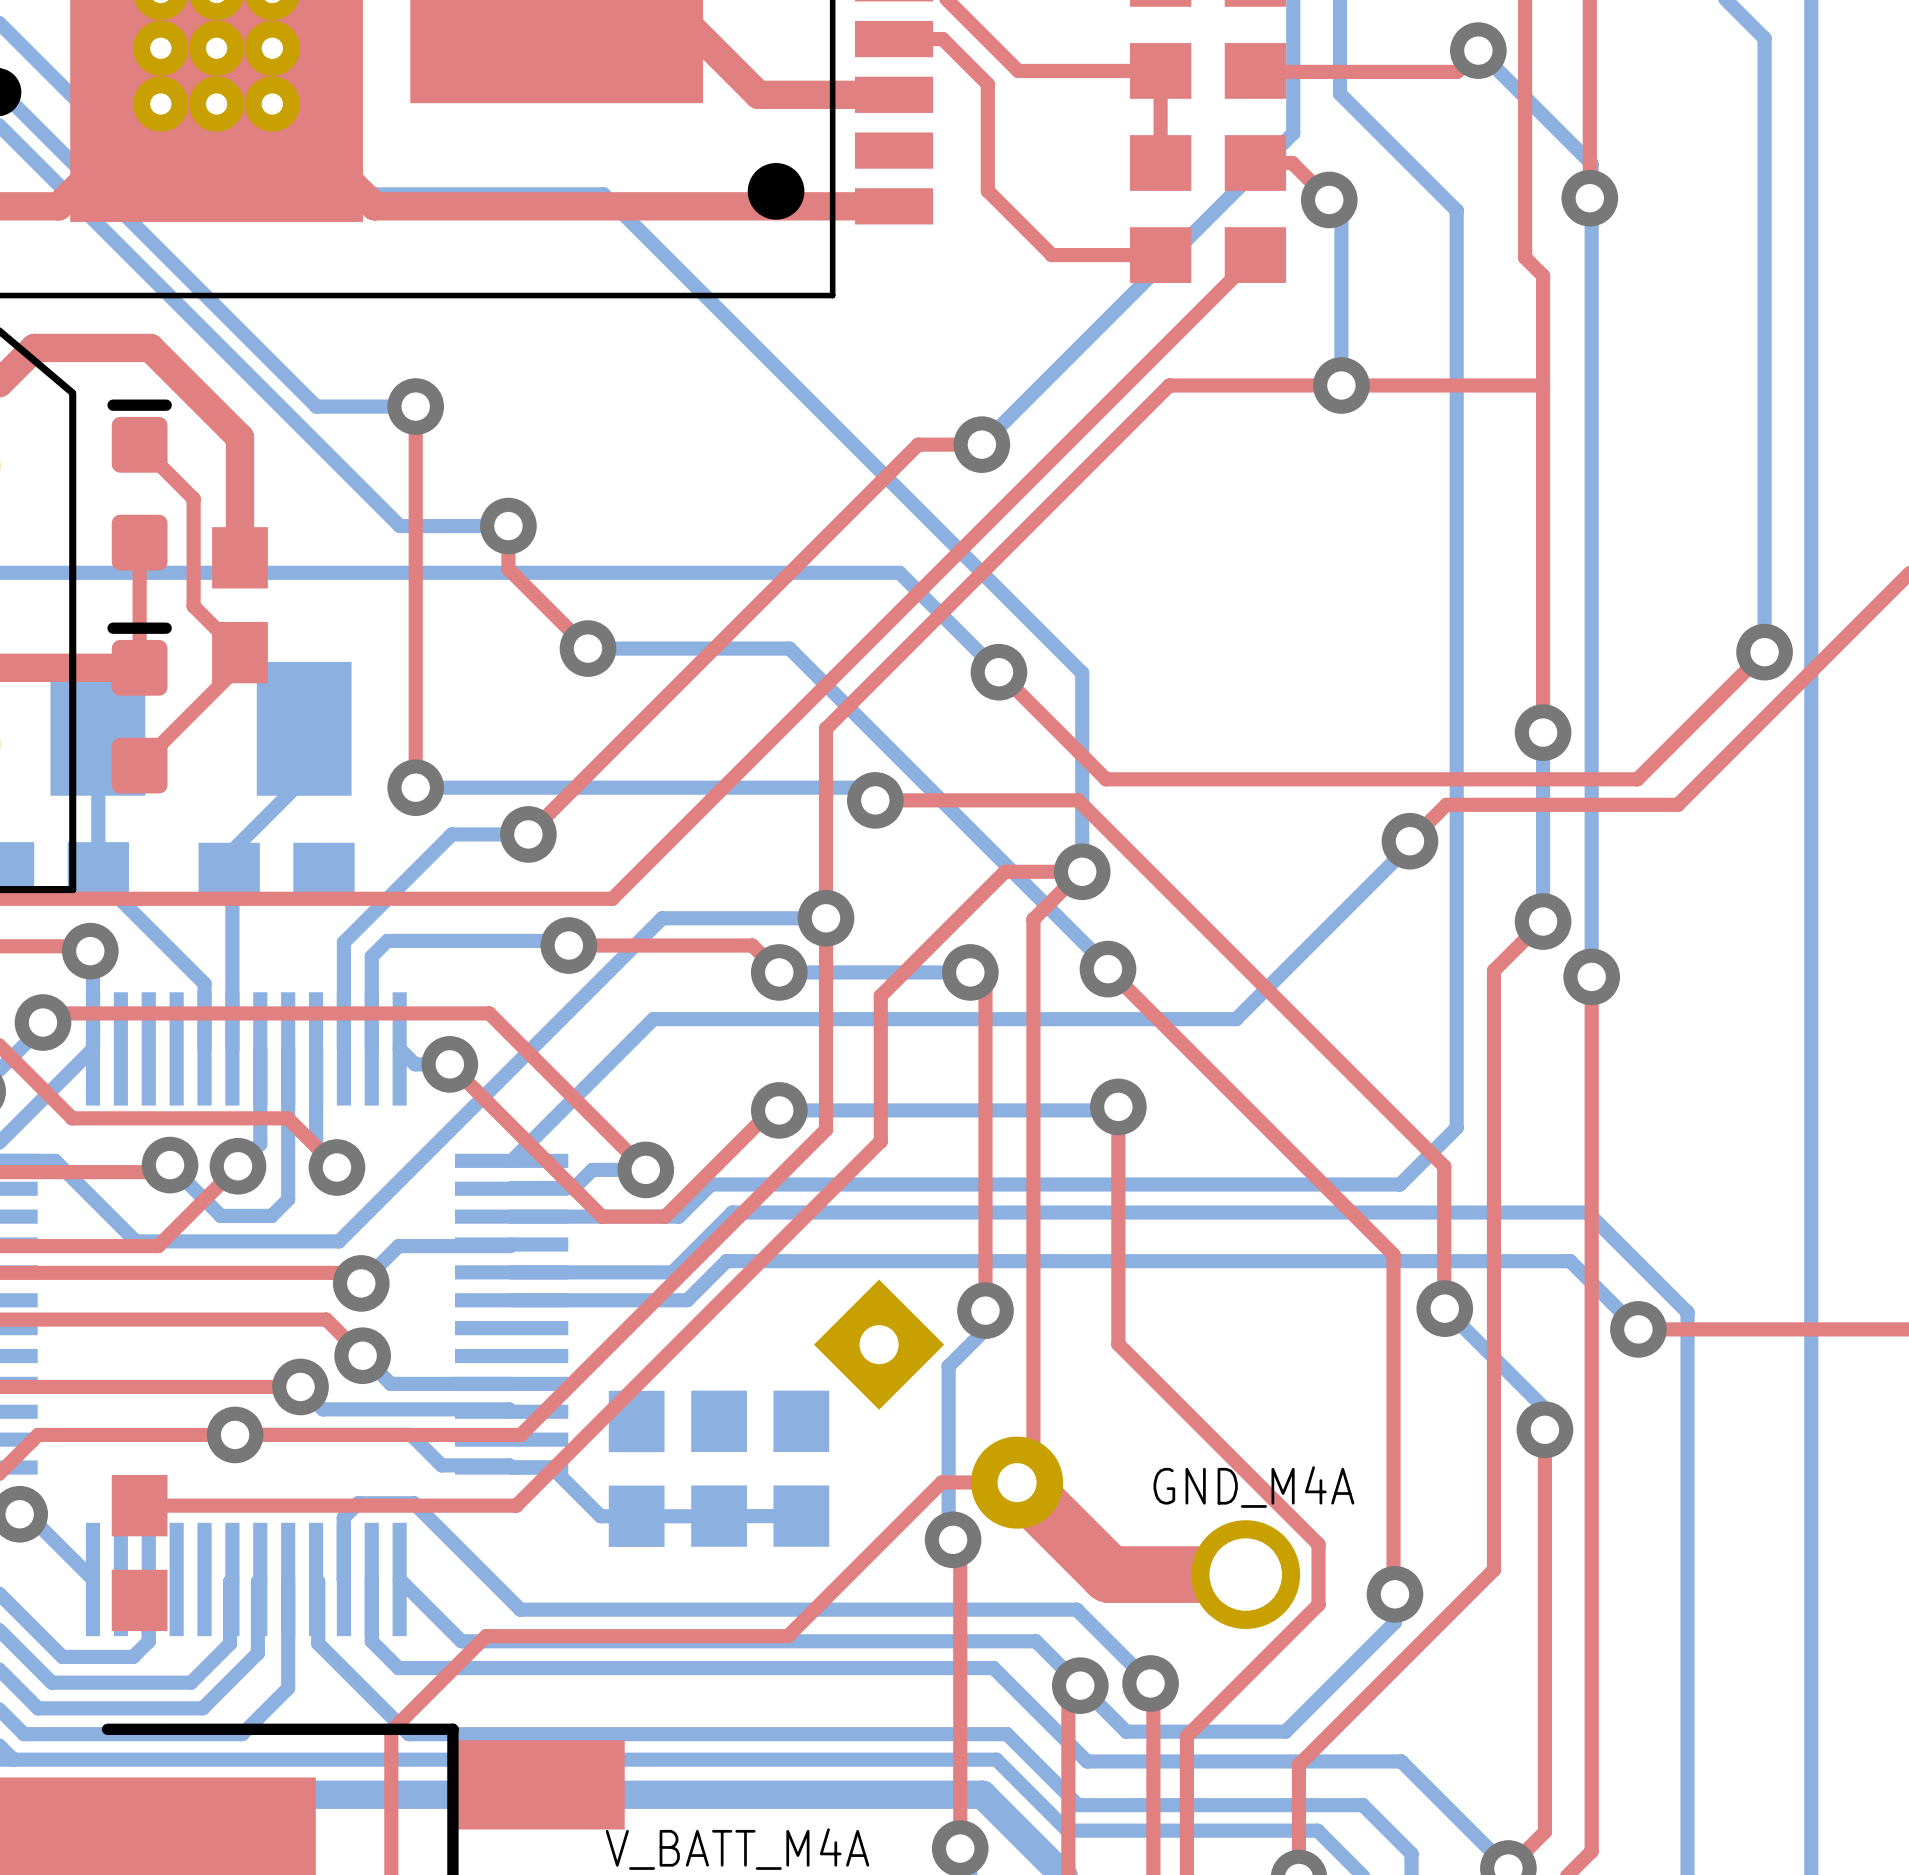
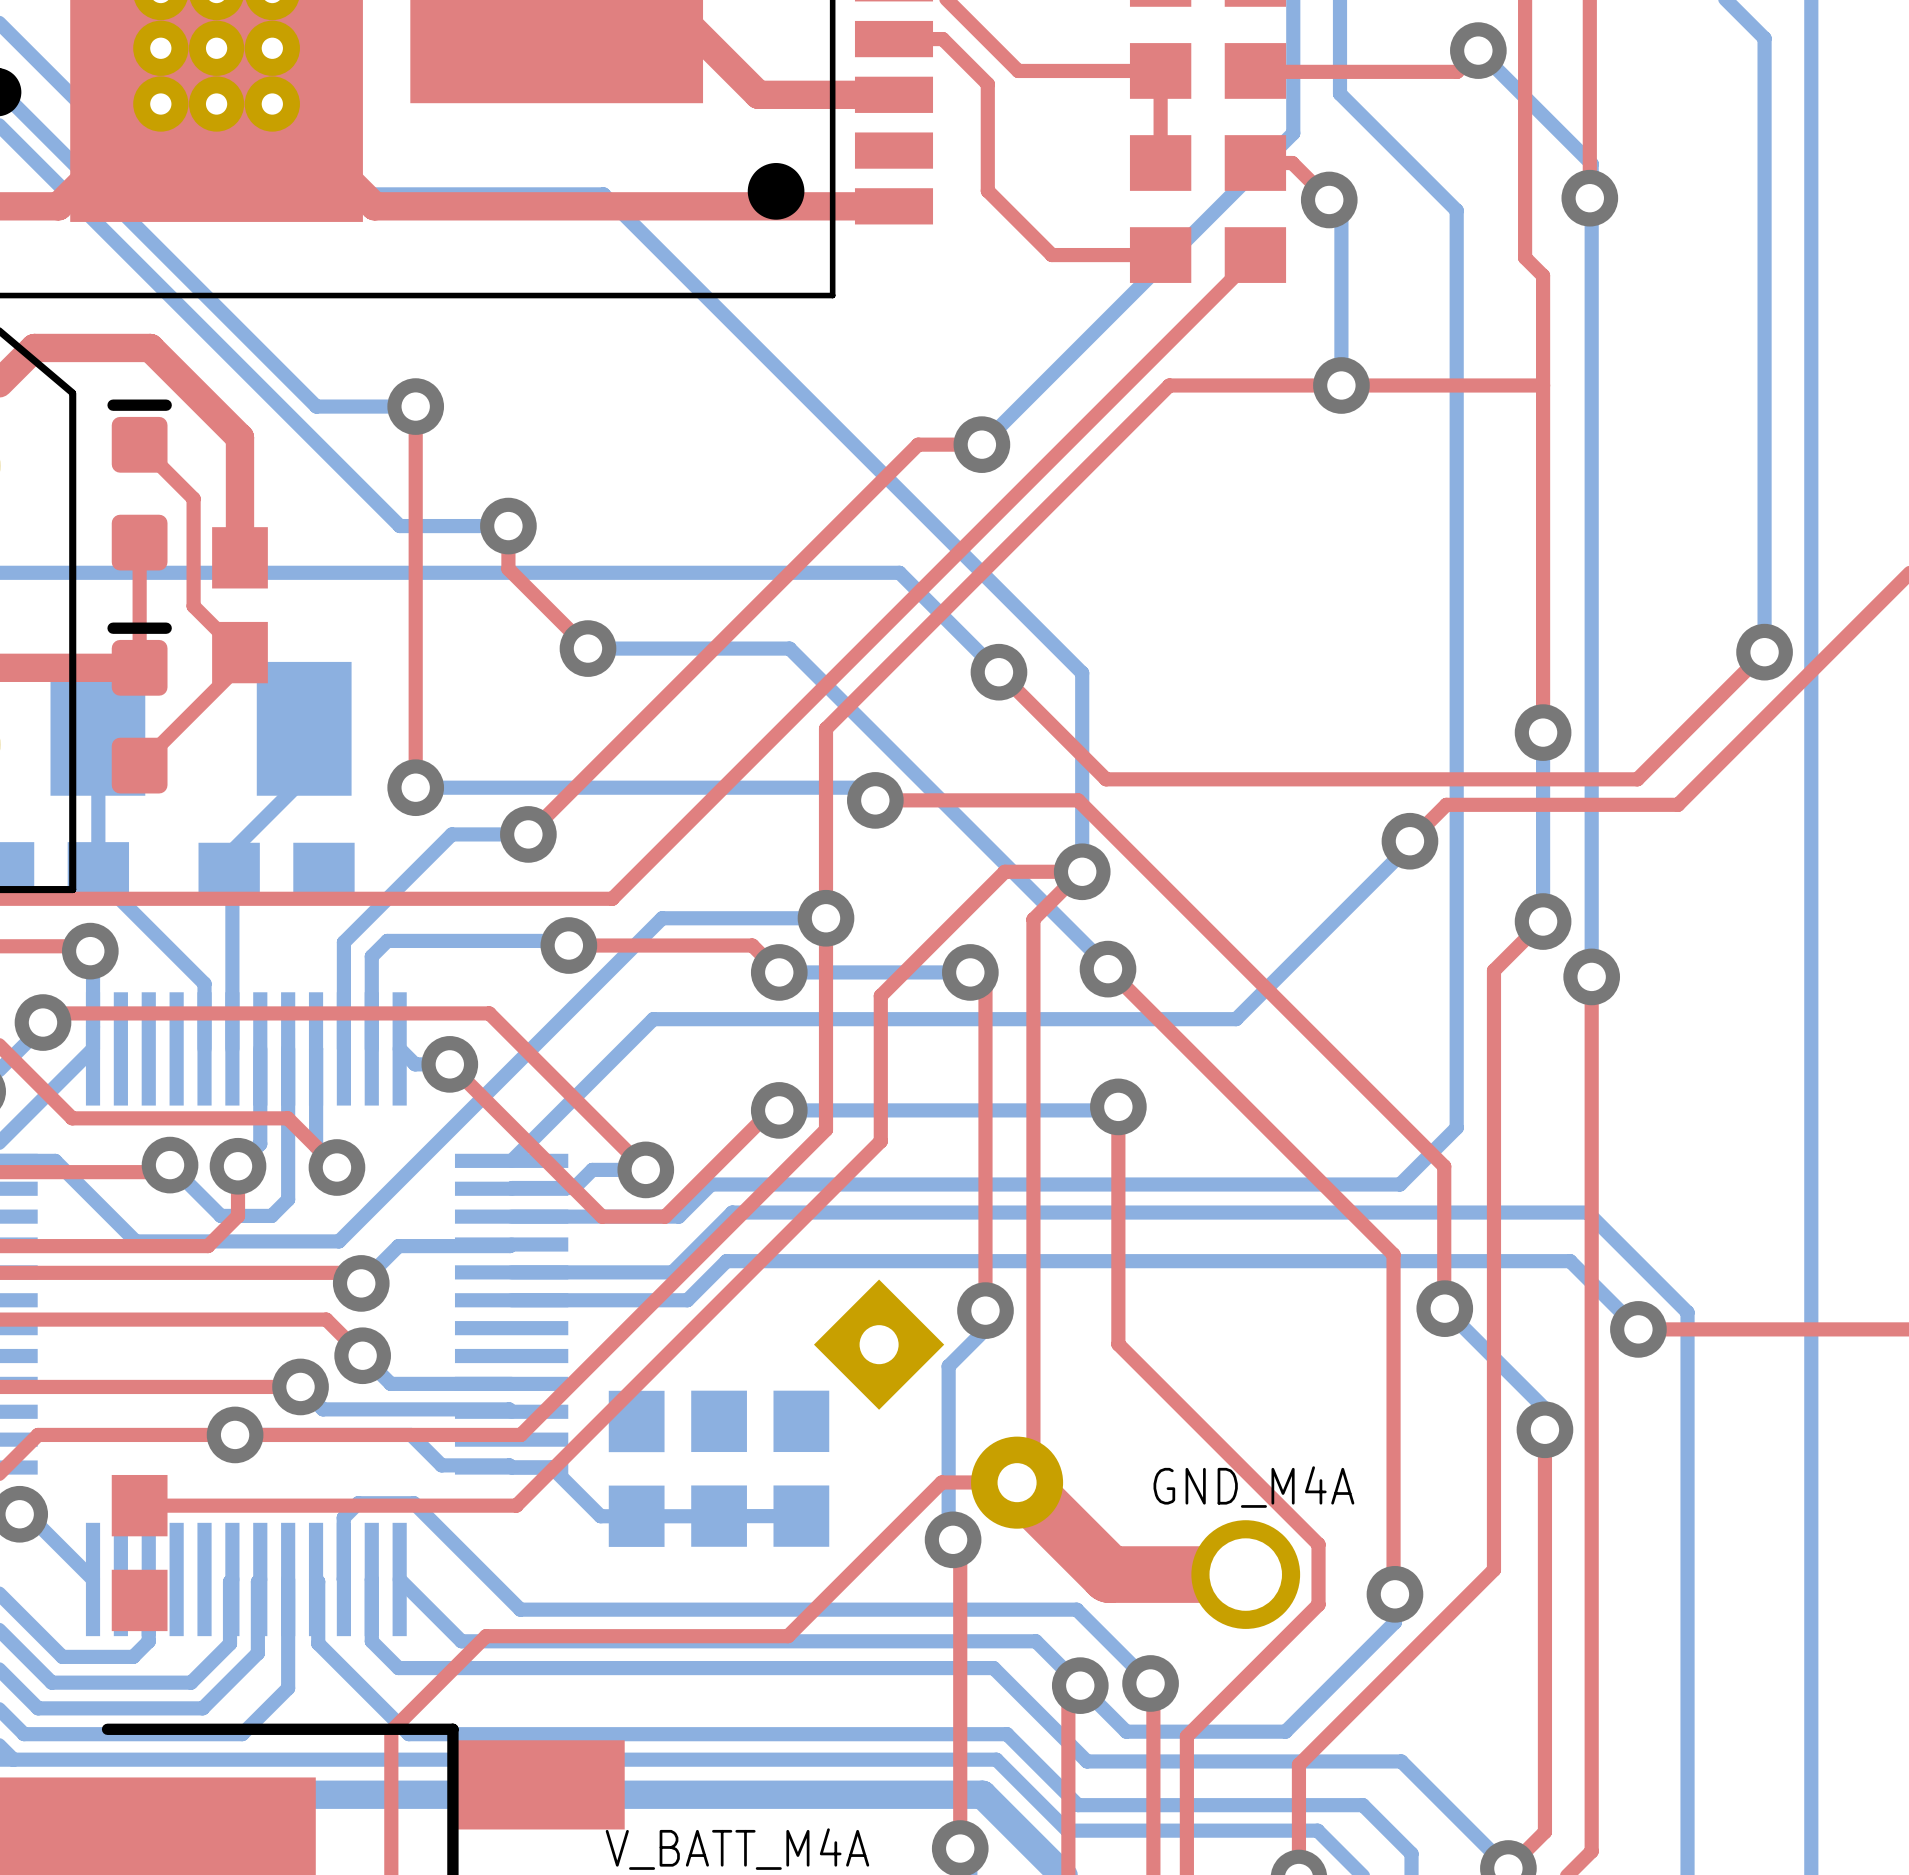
top track: (238, 1166) (158, 1246) -> (238, 1166) (238, 1216) (207, 1246) (158, 1246)

